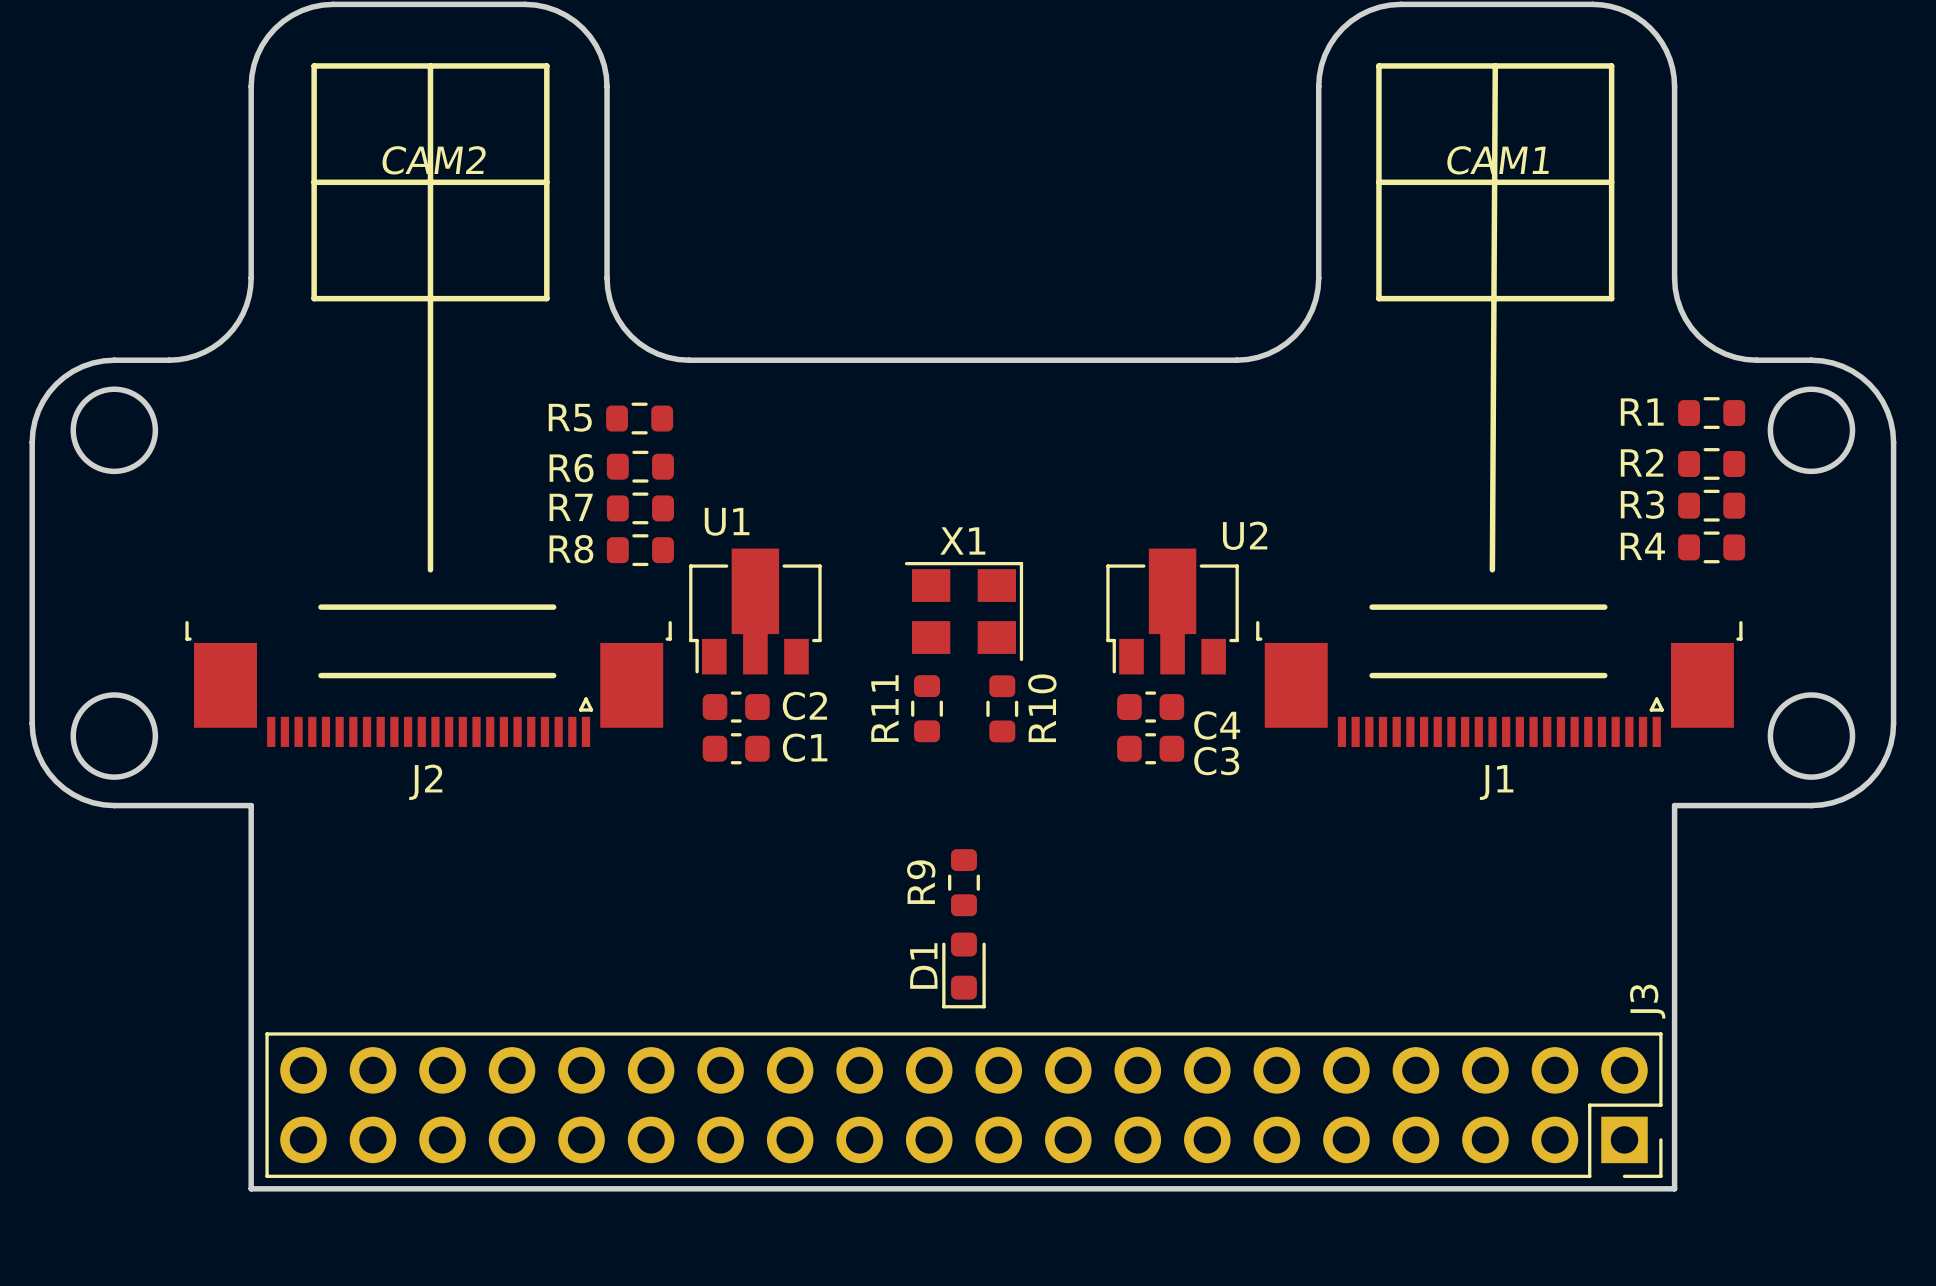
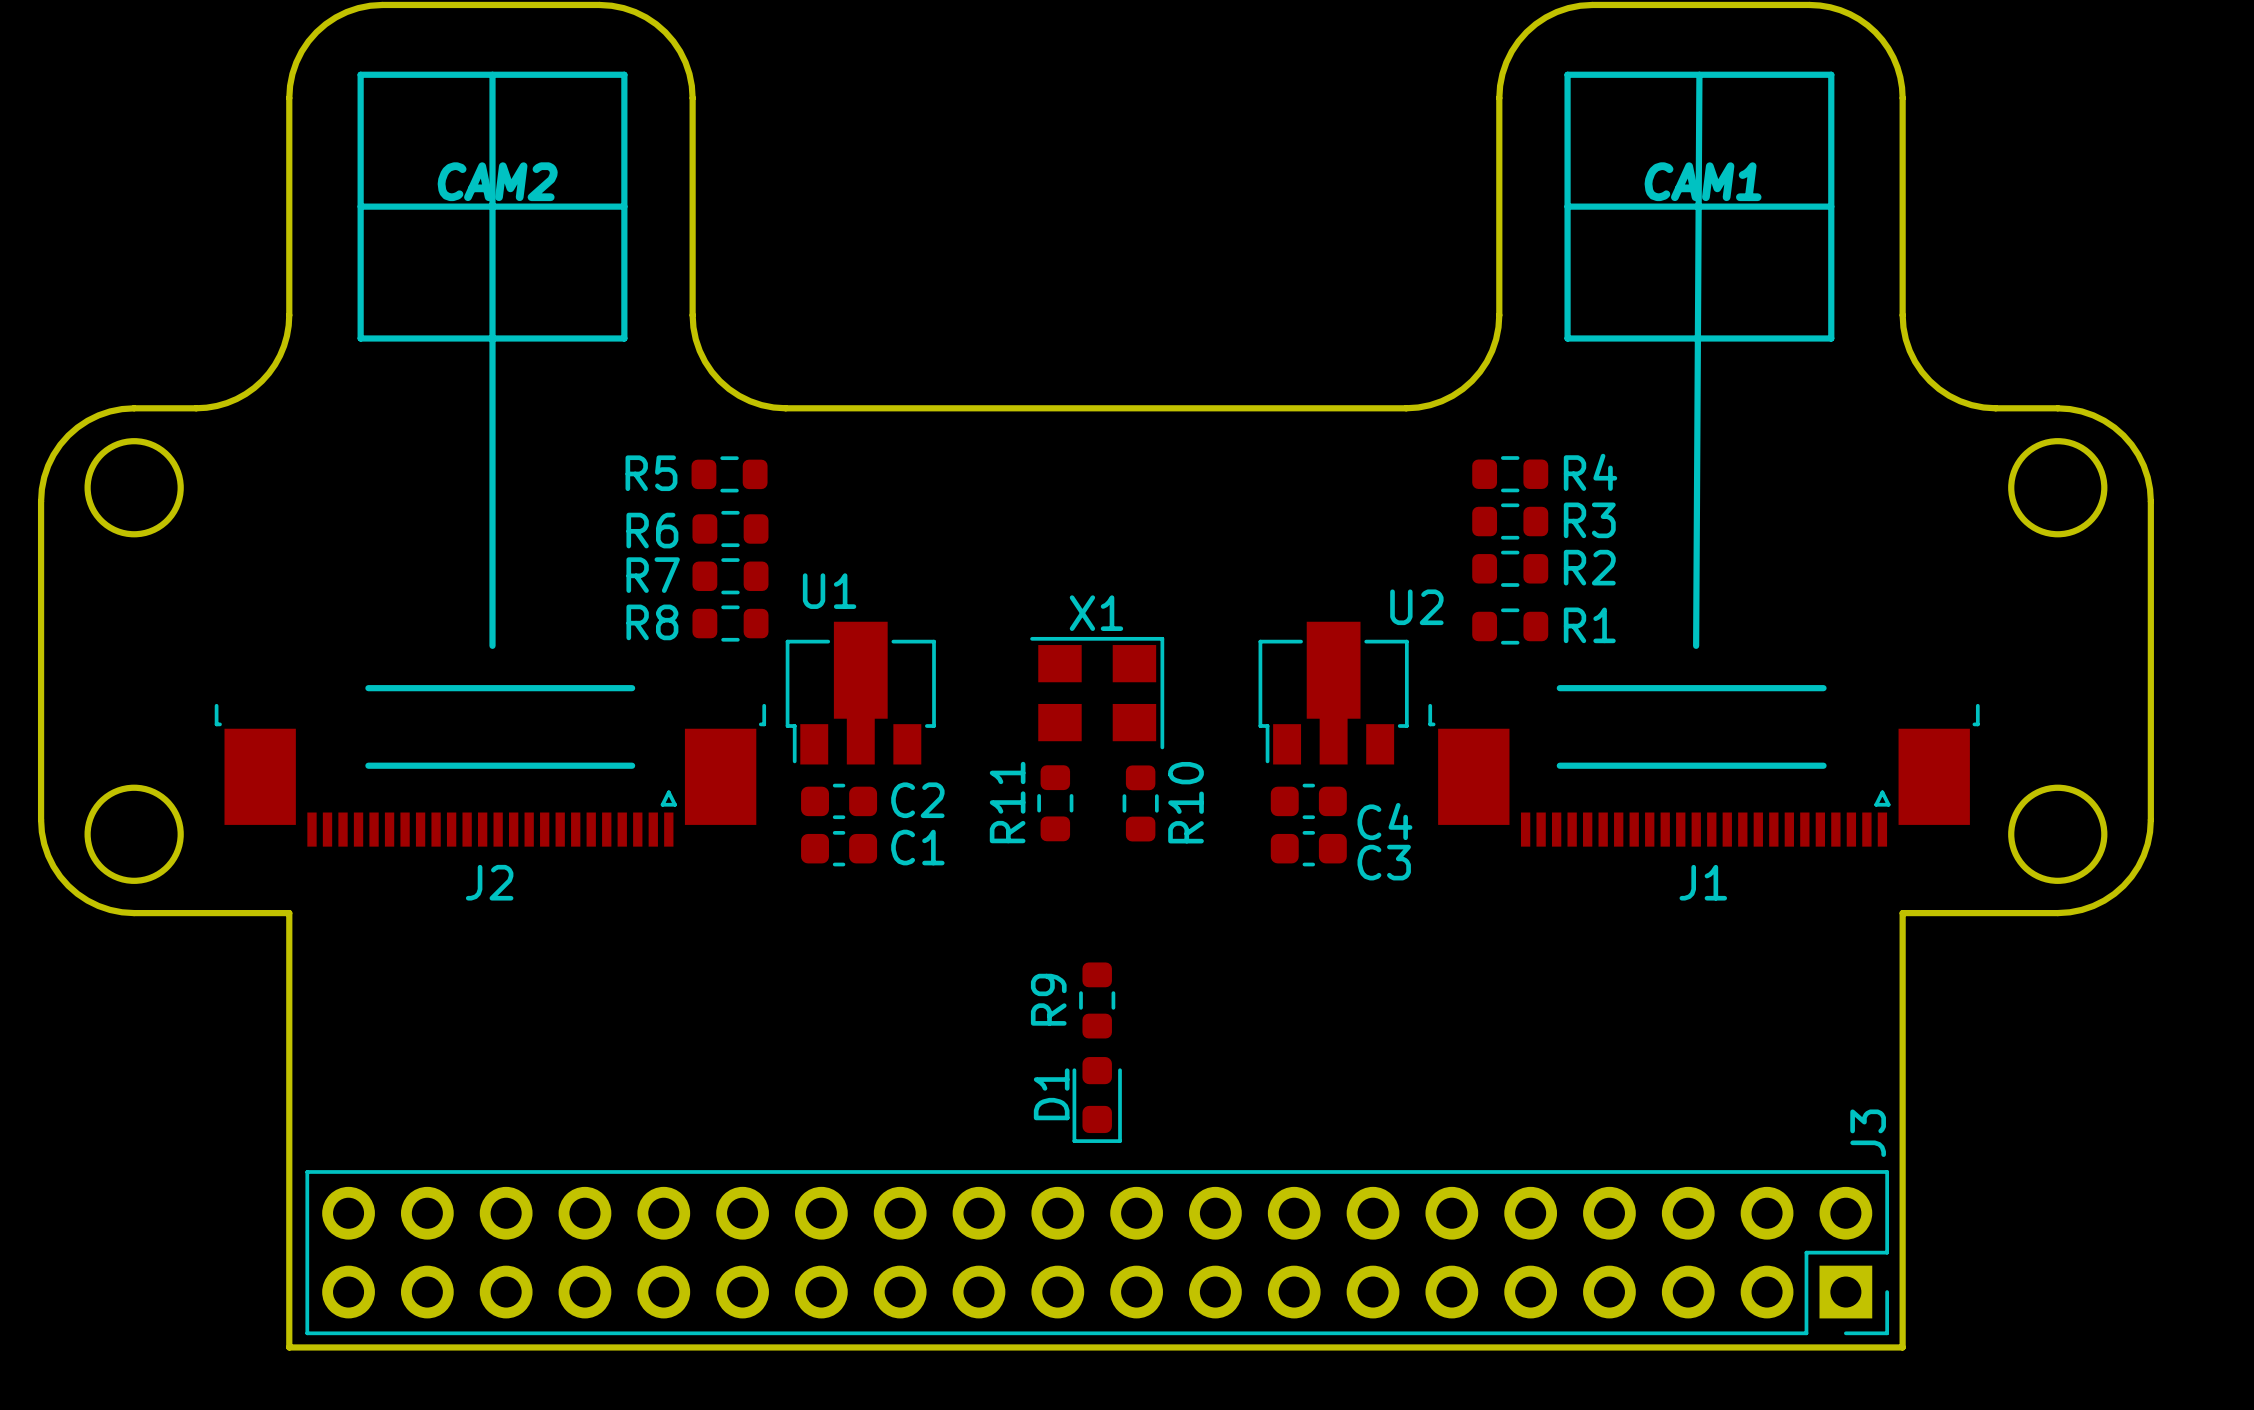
R1 name position: R1 (1642, 412) -> R1 (1589, 625)
R1 position: (1711, 413) -> (1510, 626)
R2 name position: R2 (1642, 462) -> R2 (1589, 567)
R2 position: (1711, 463) -> (1510, 568)
R3 name position: R3 (1642, 504) -> R3 (1589, 520)
R3 position: (1711, 505) -> (1510, 521)
R4 name position: R4 (1642, 546) -> R4 (1590, 472)
R4 position: (1711, 547) -> (1510, 474)

